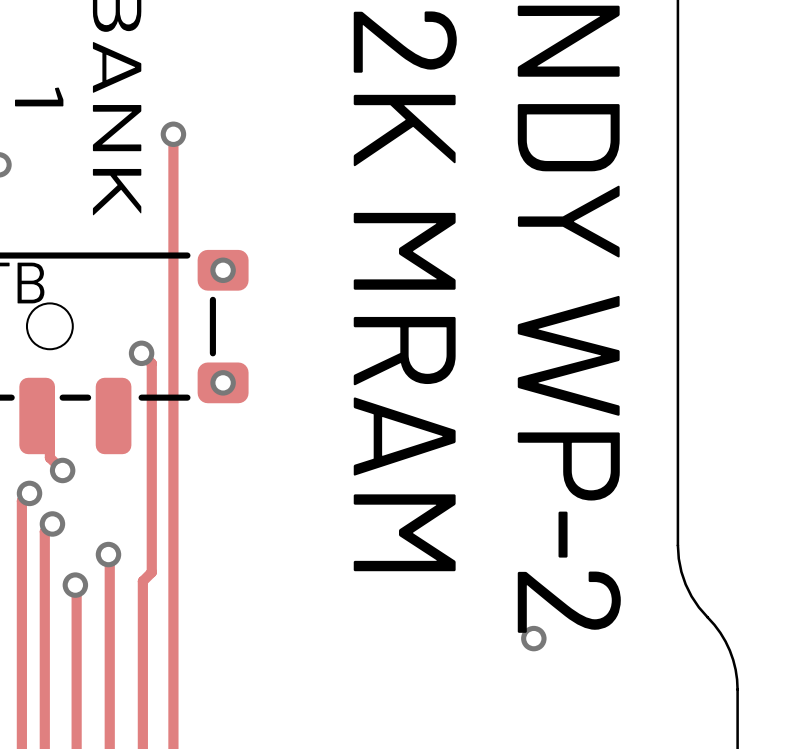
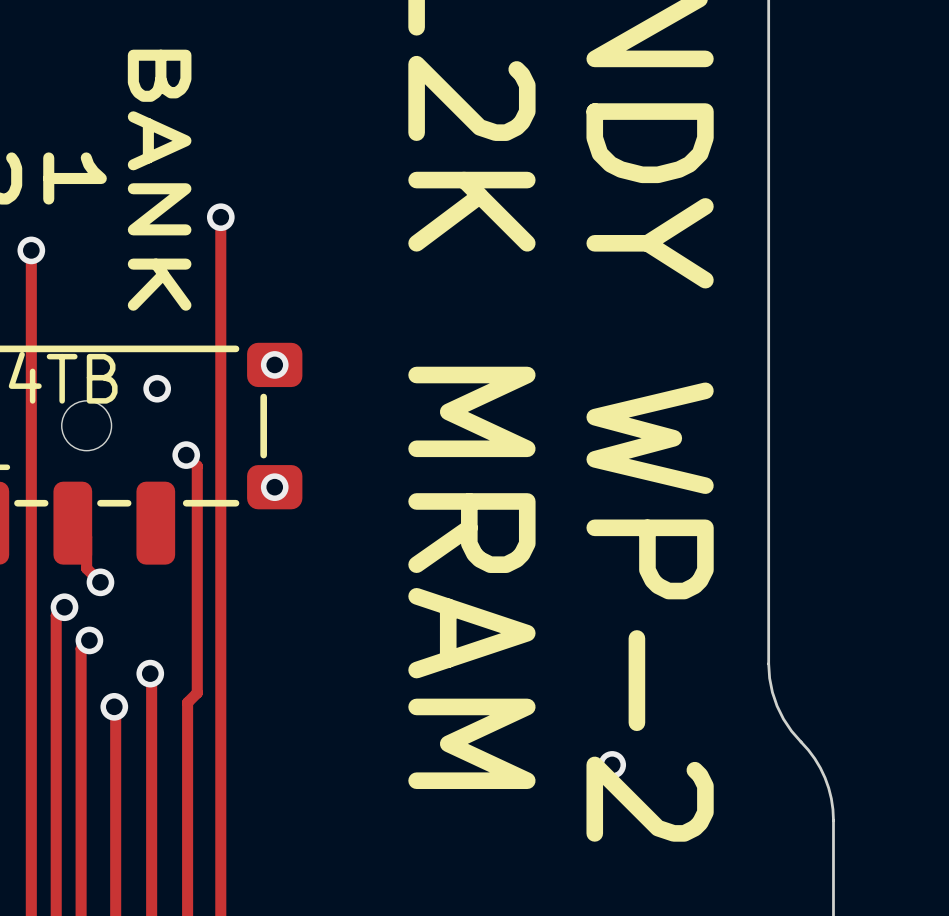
via: none -> (157, 388)

